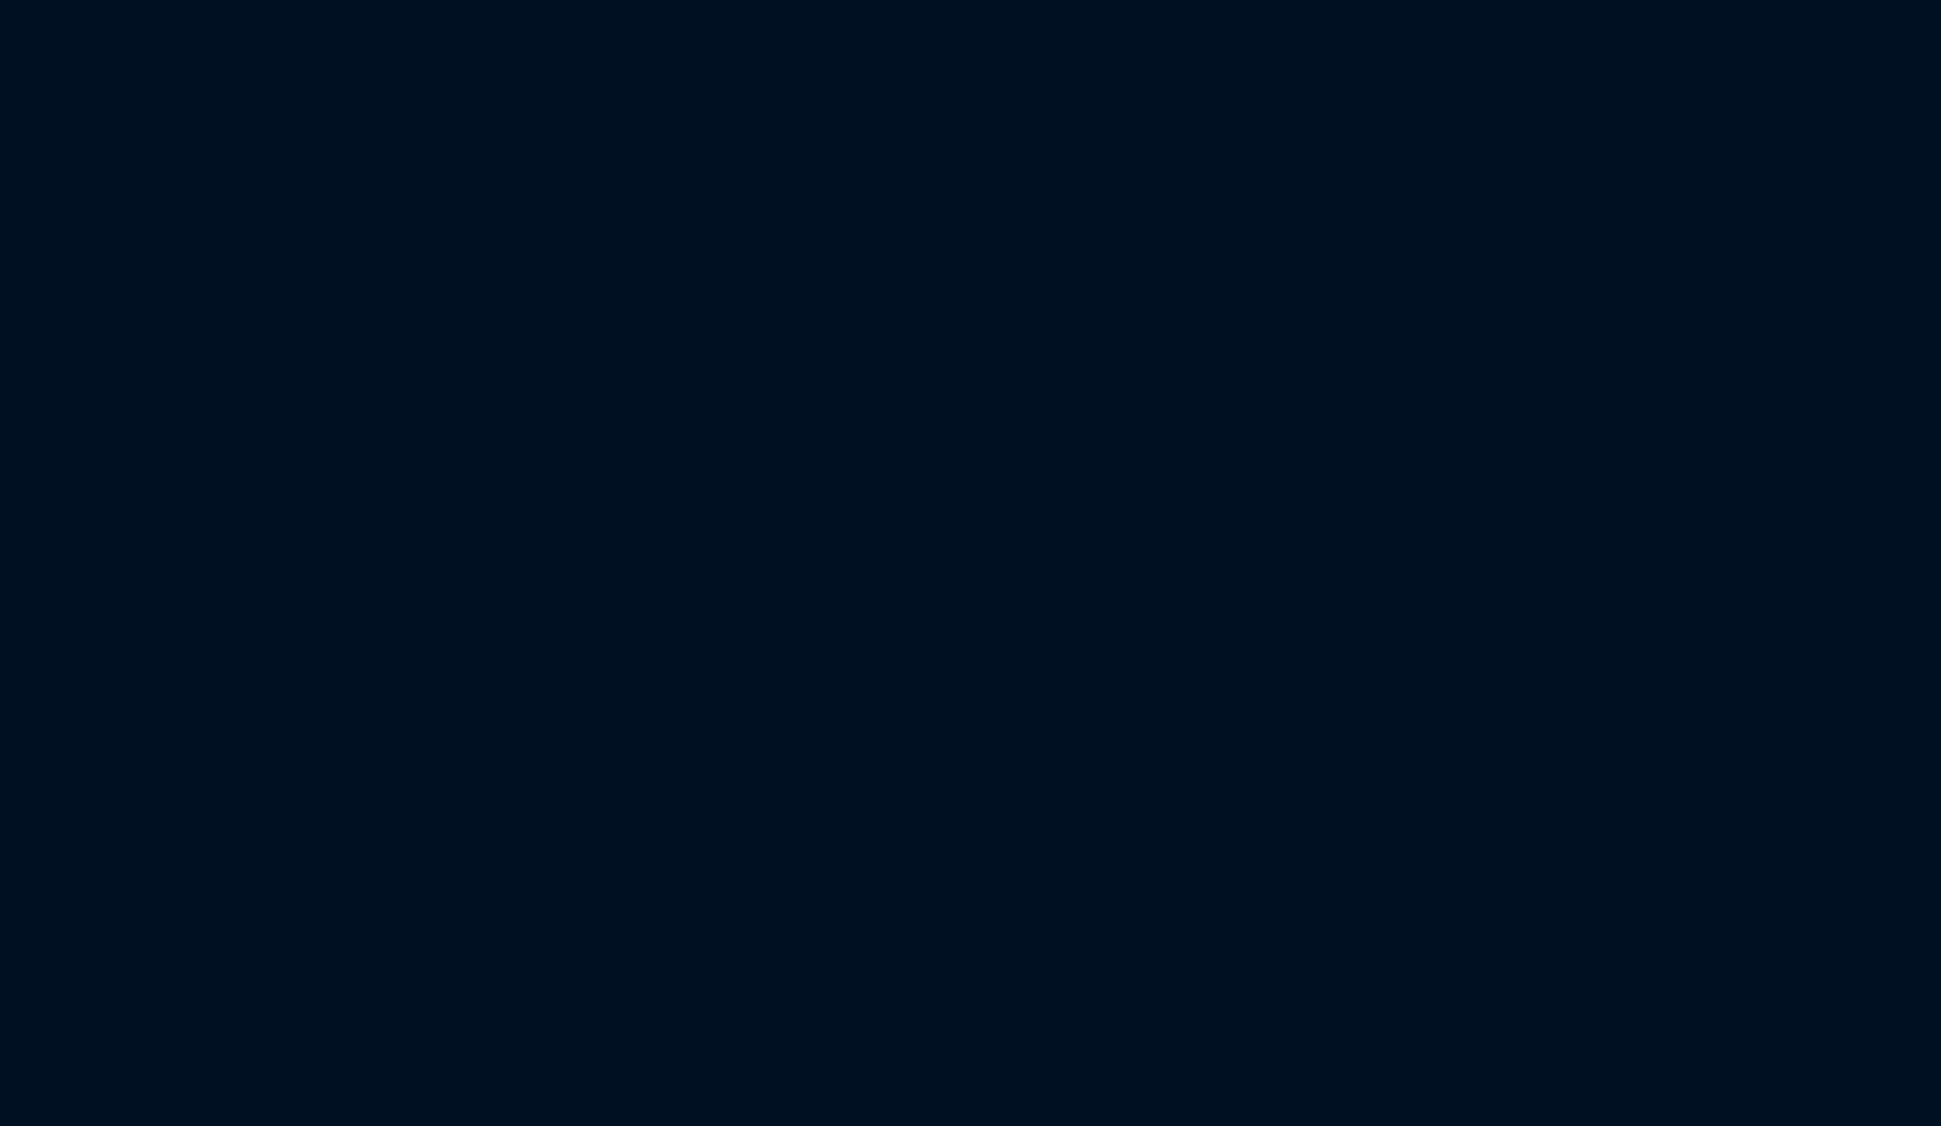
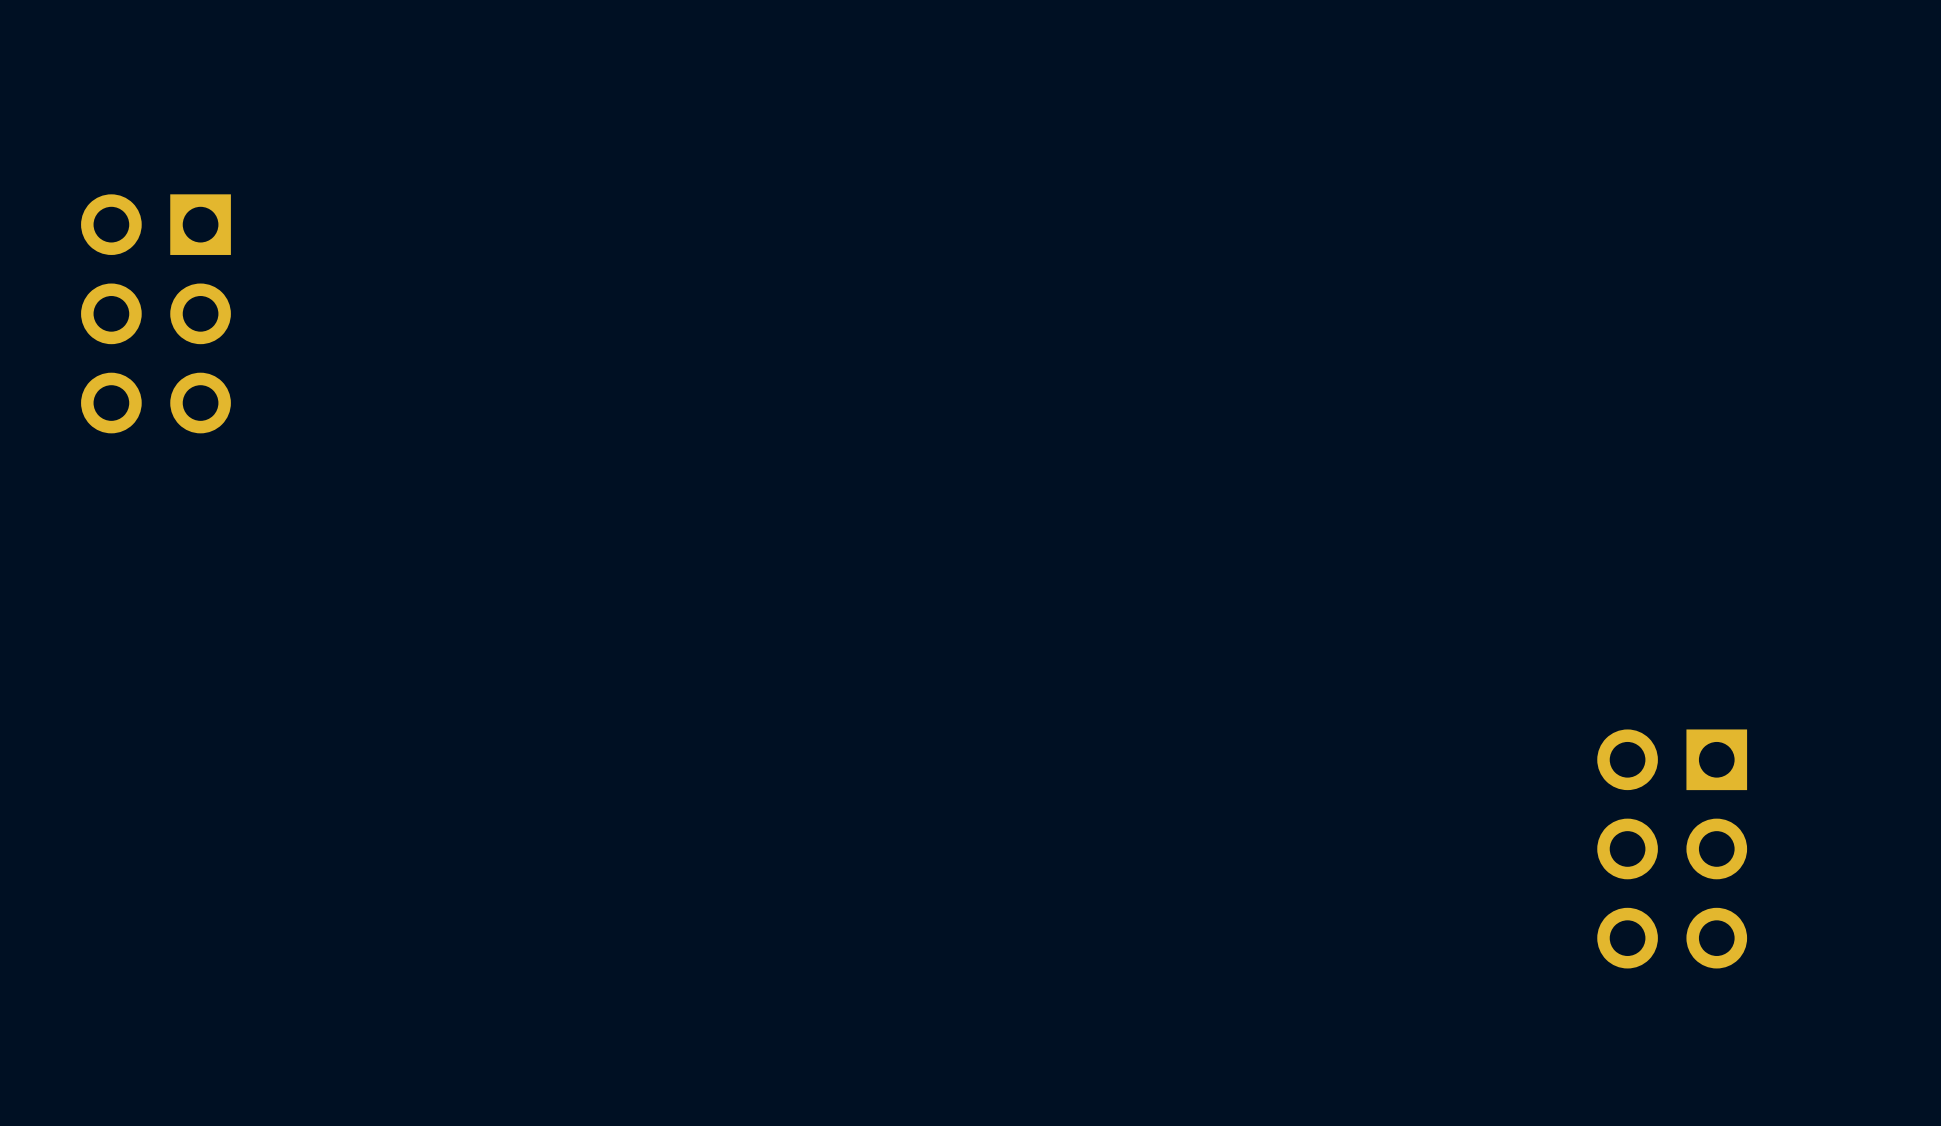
part: none -> (155, 313)
part: none -> (1672, 848)

